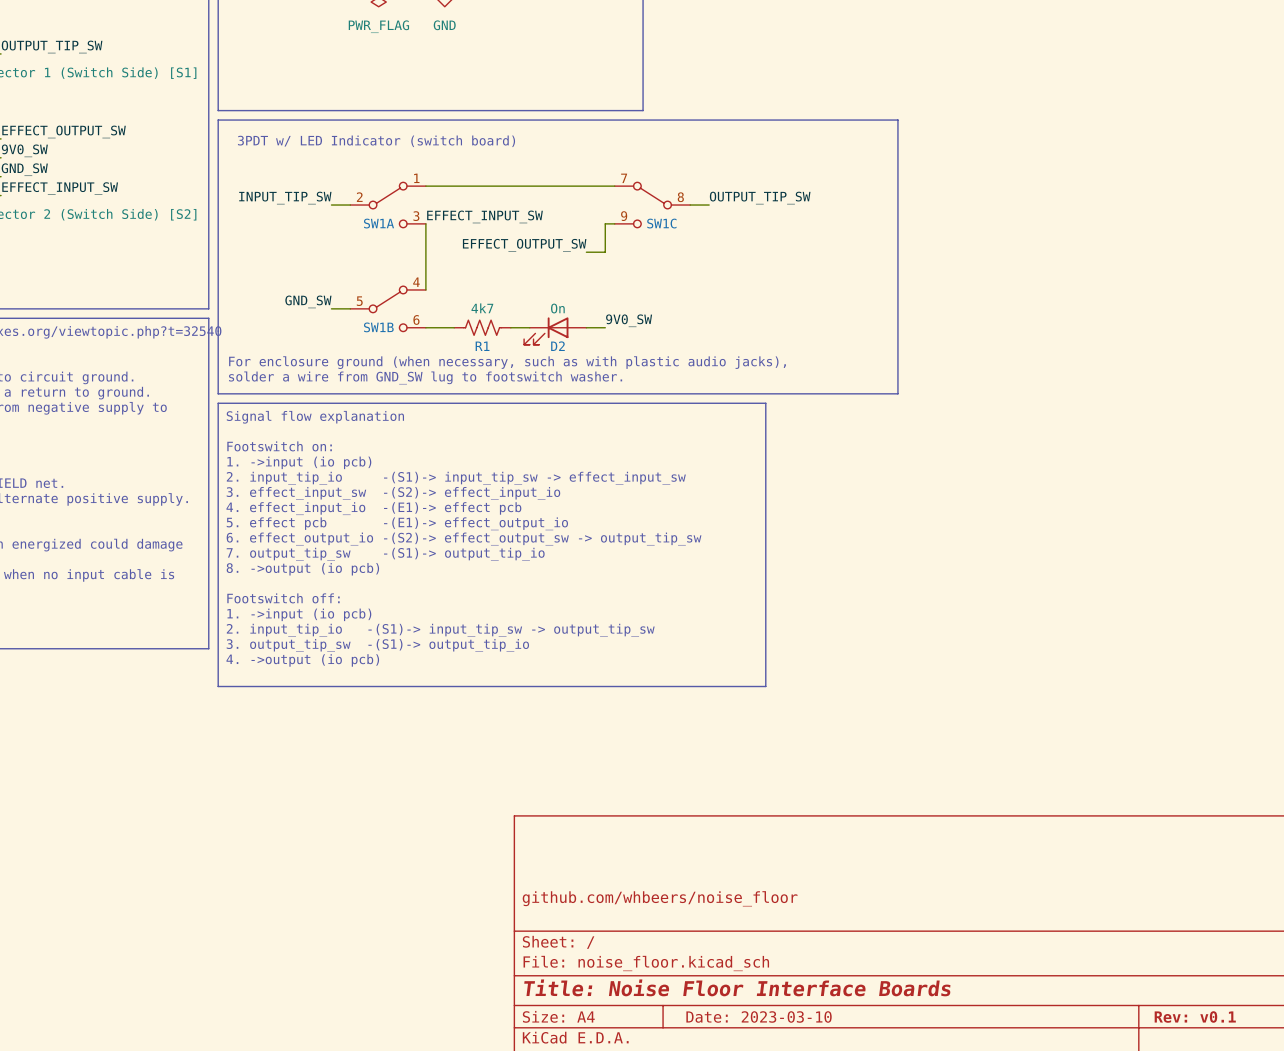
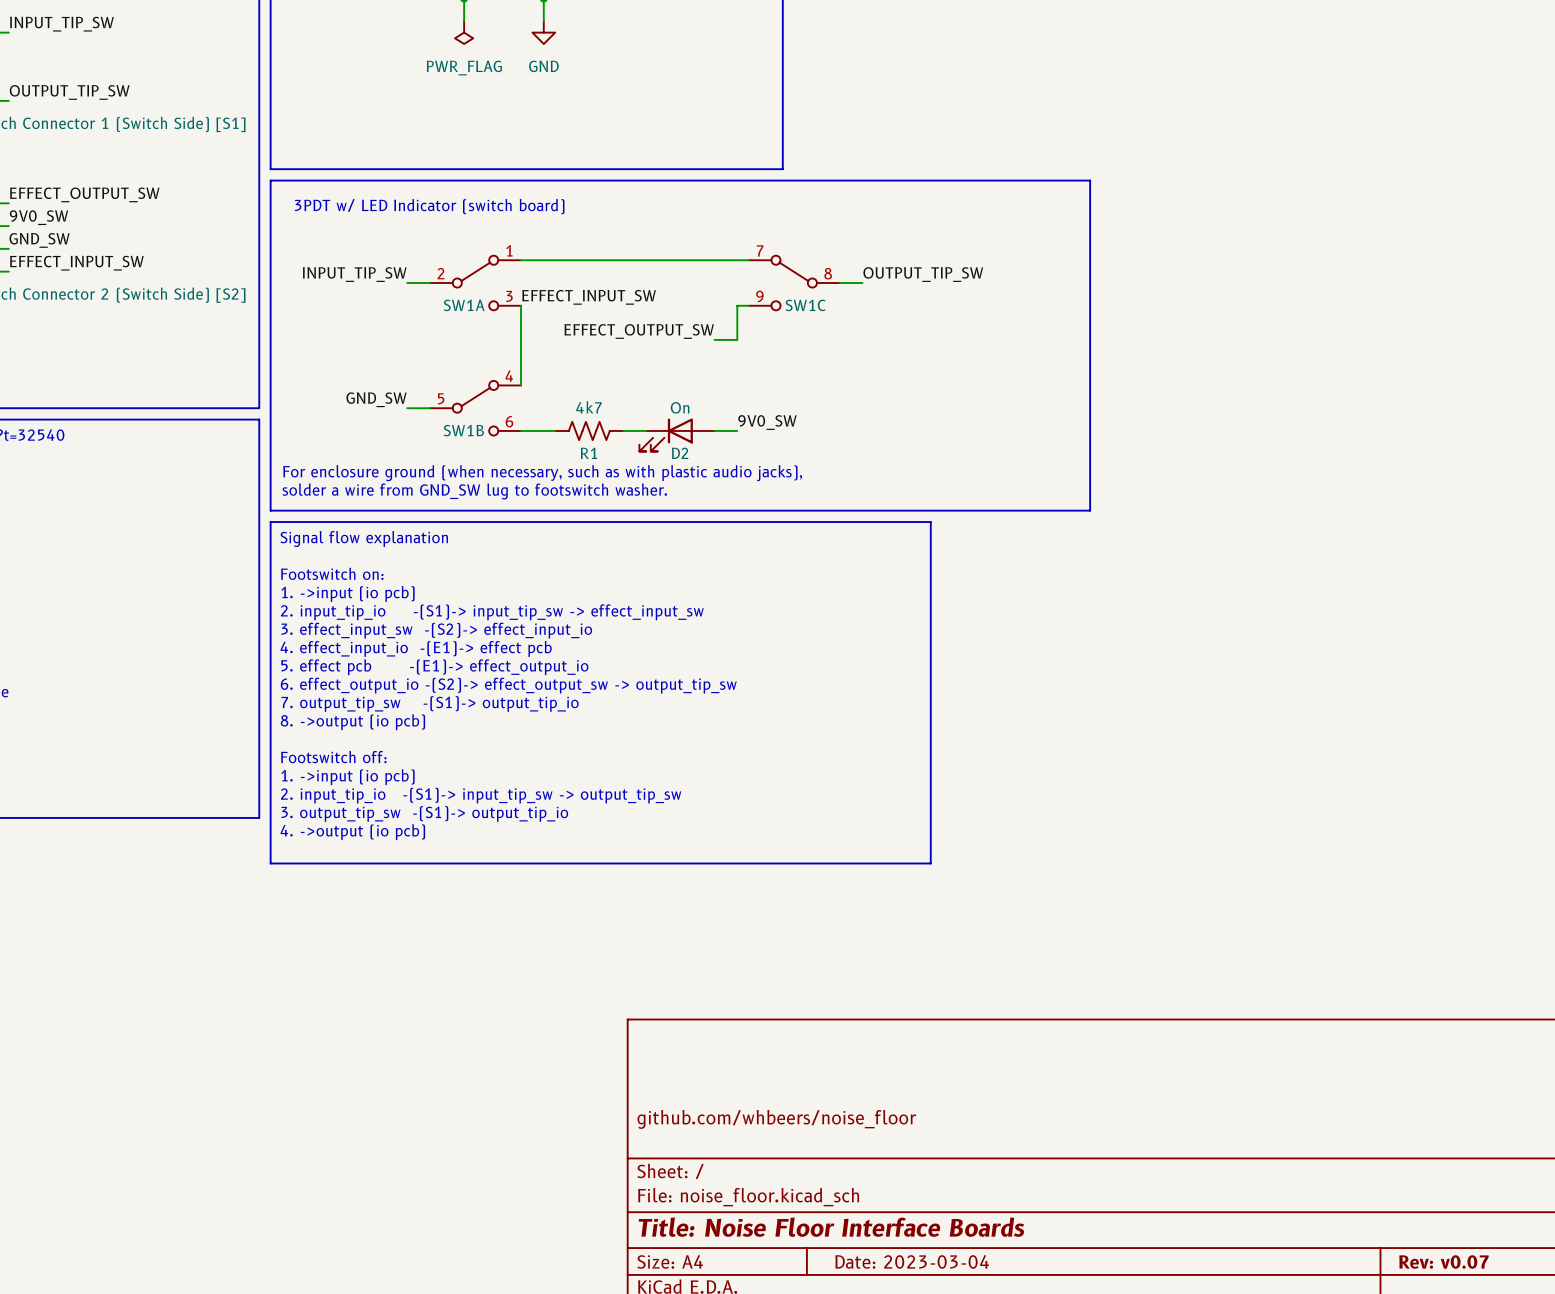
title block: Date: 2023-03-10 (759, 1016) -> Date: 2023-03-04 (912, 1261)
title block: Rev: v0.1 (1195, 1016) -> Rev: v0.07 (1443, 1262)

